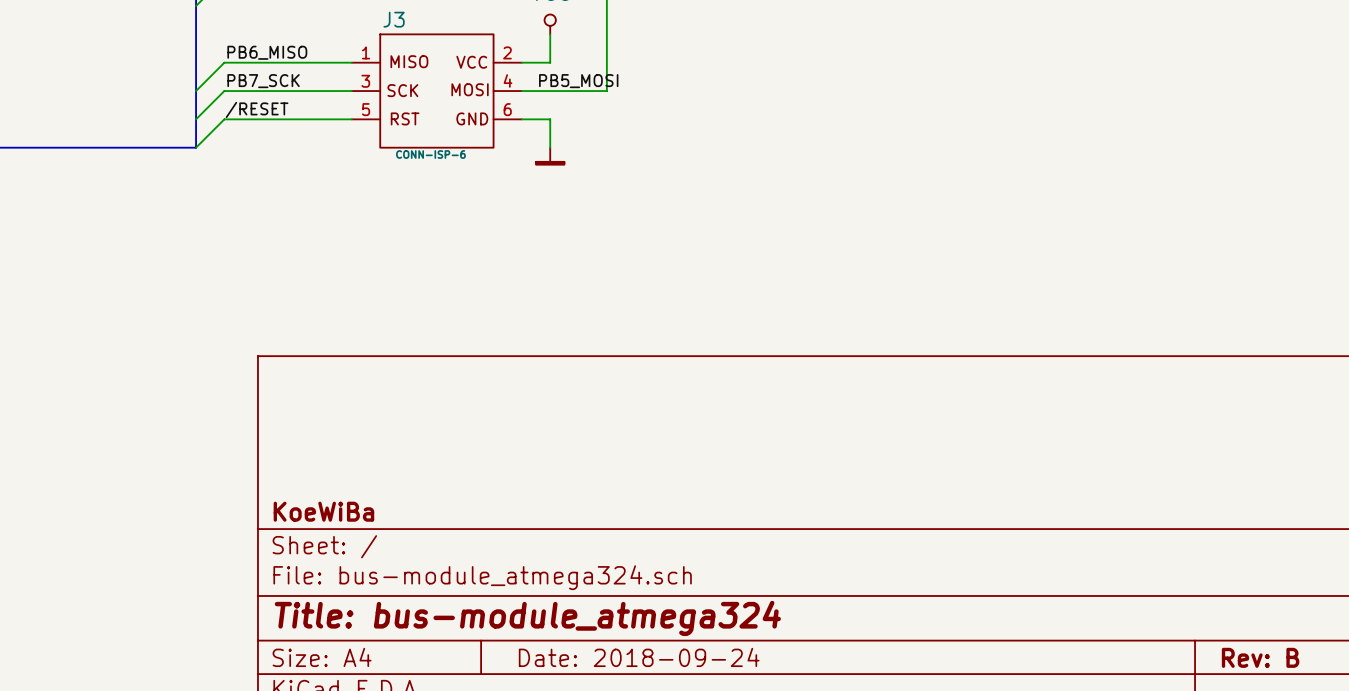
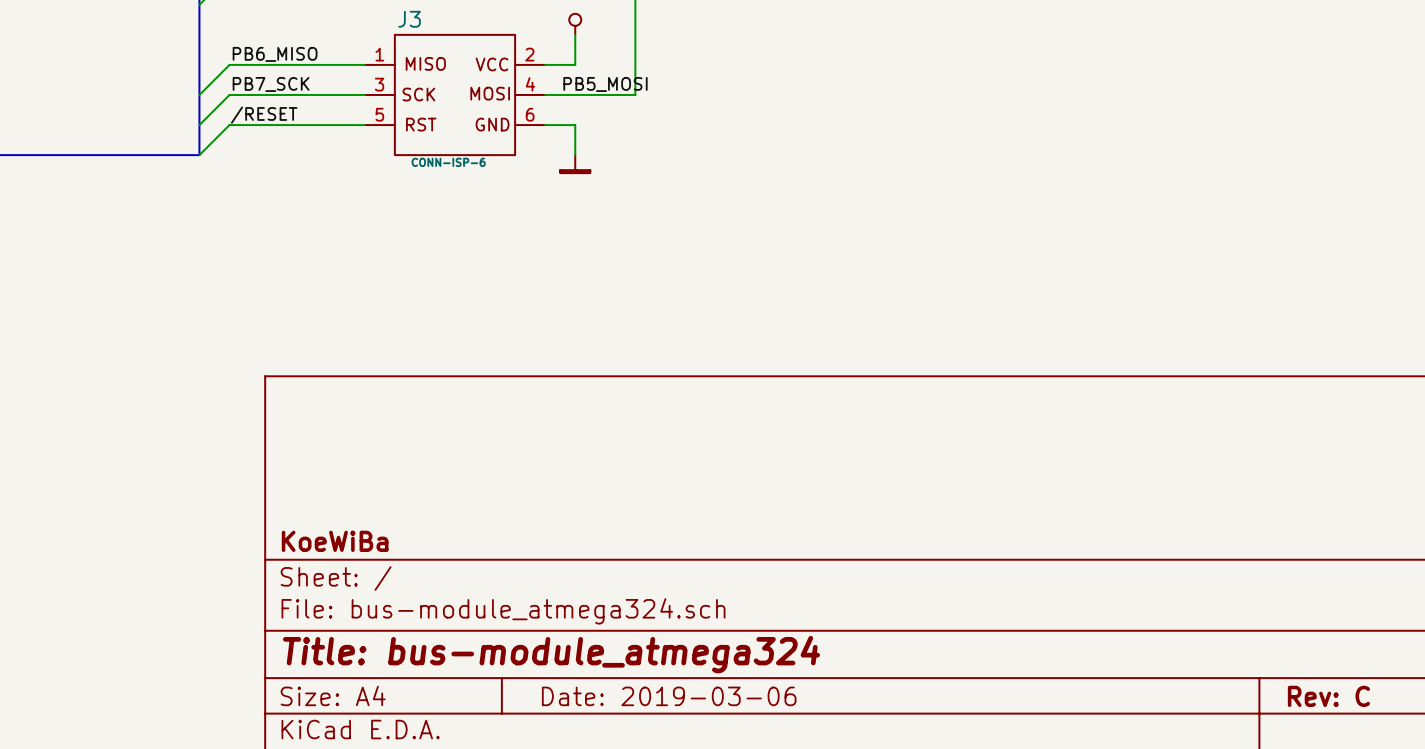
title block: Date: 2018-09-24 (639, 657) -> Date: 2019-03-06 (669, 696)
title block: Rev: B (1260, 657) -> Rev: C (1328, 696)

